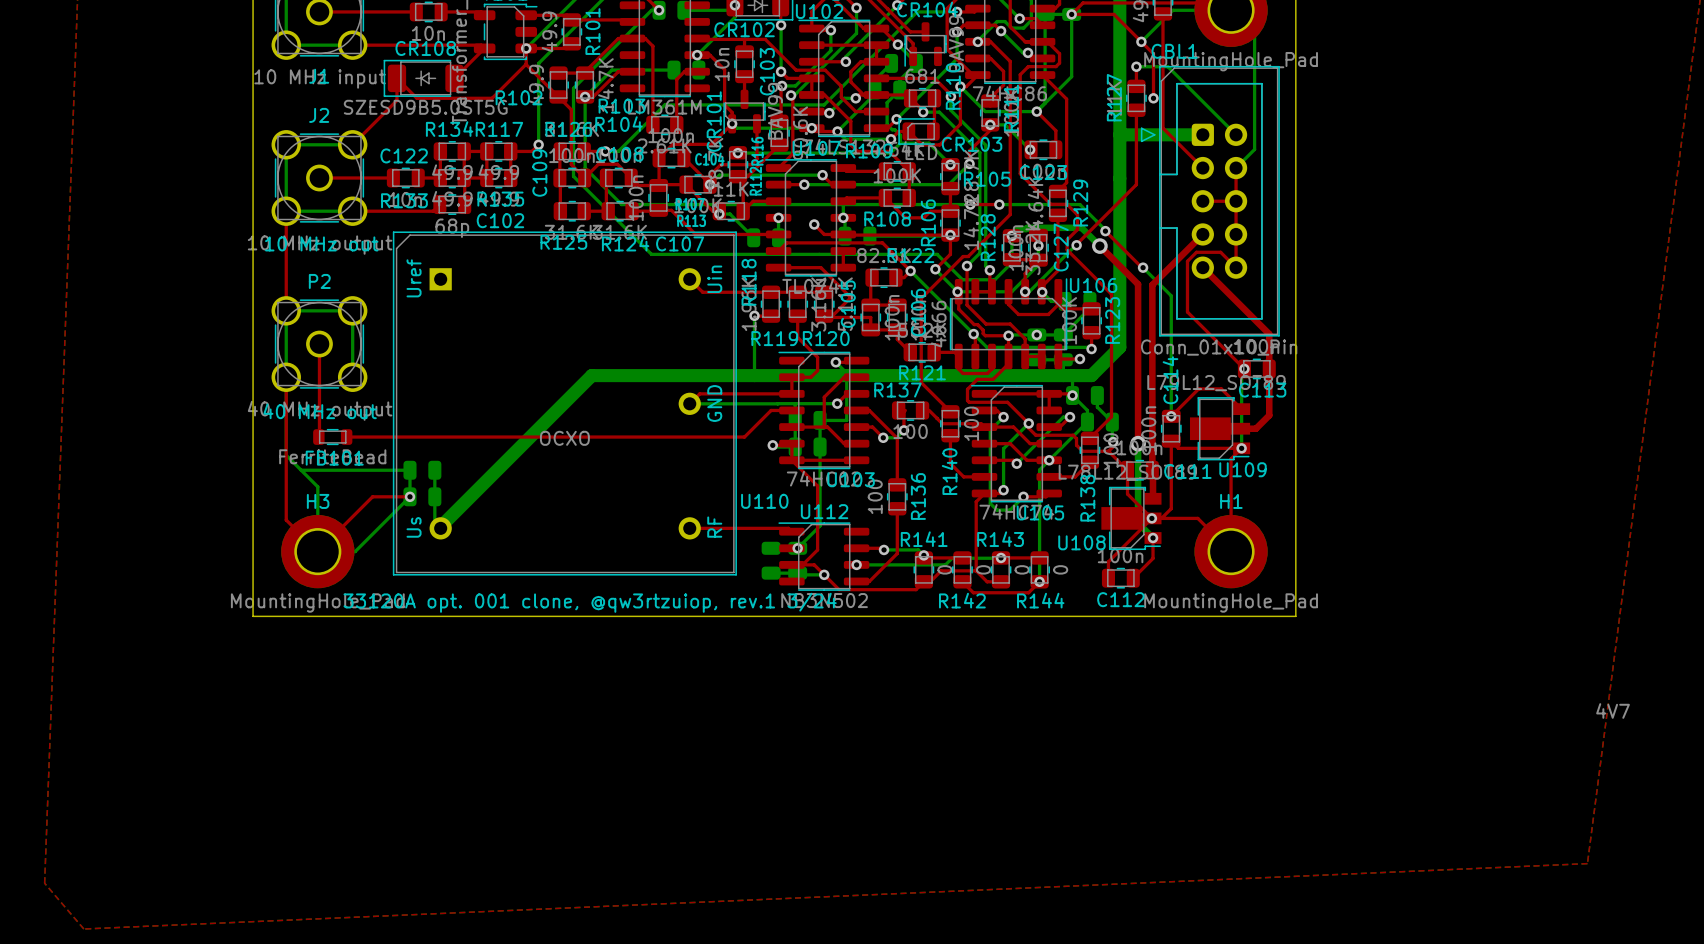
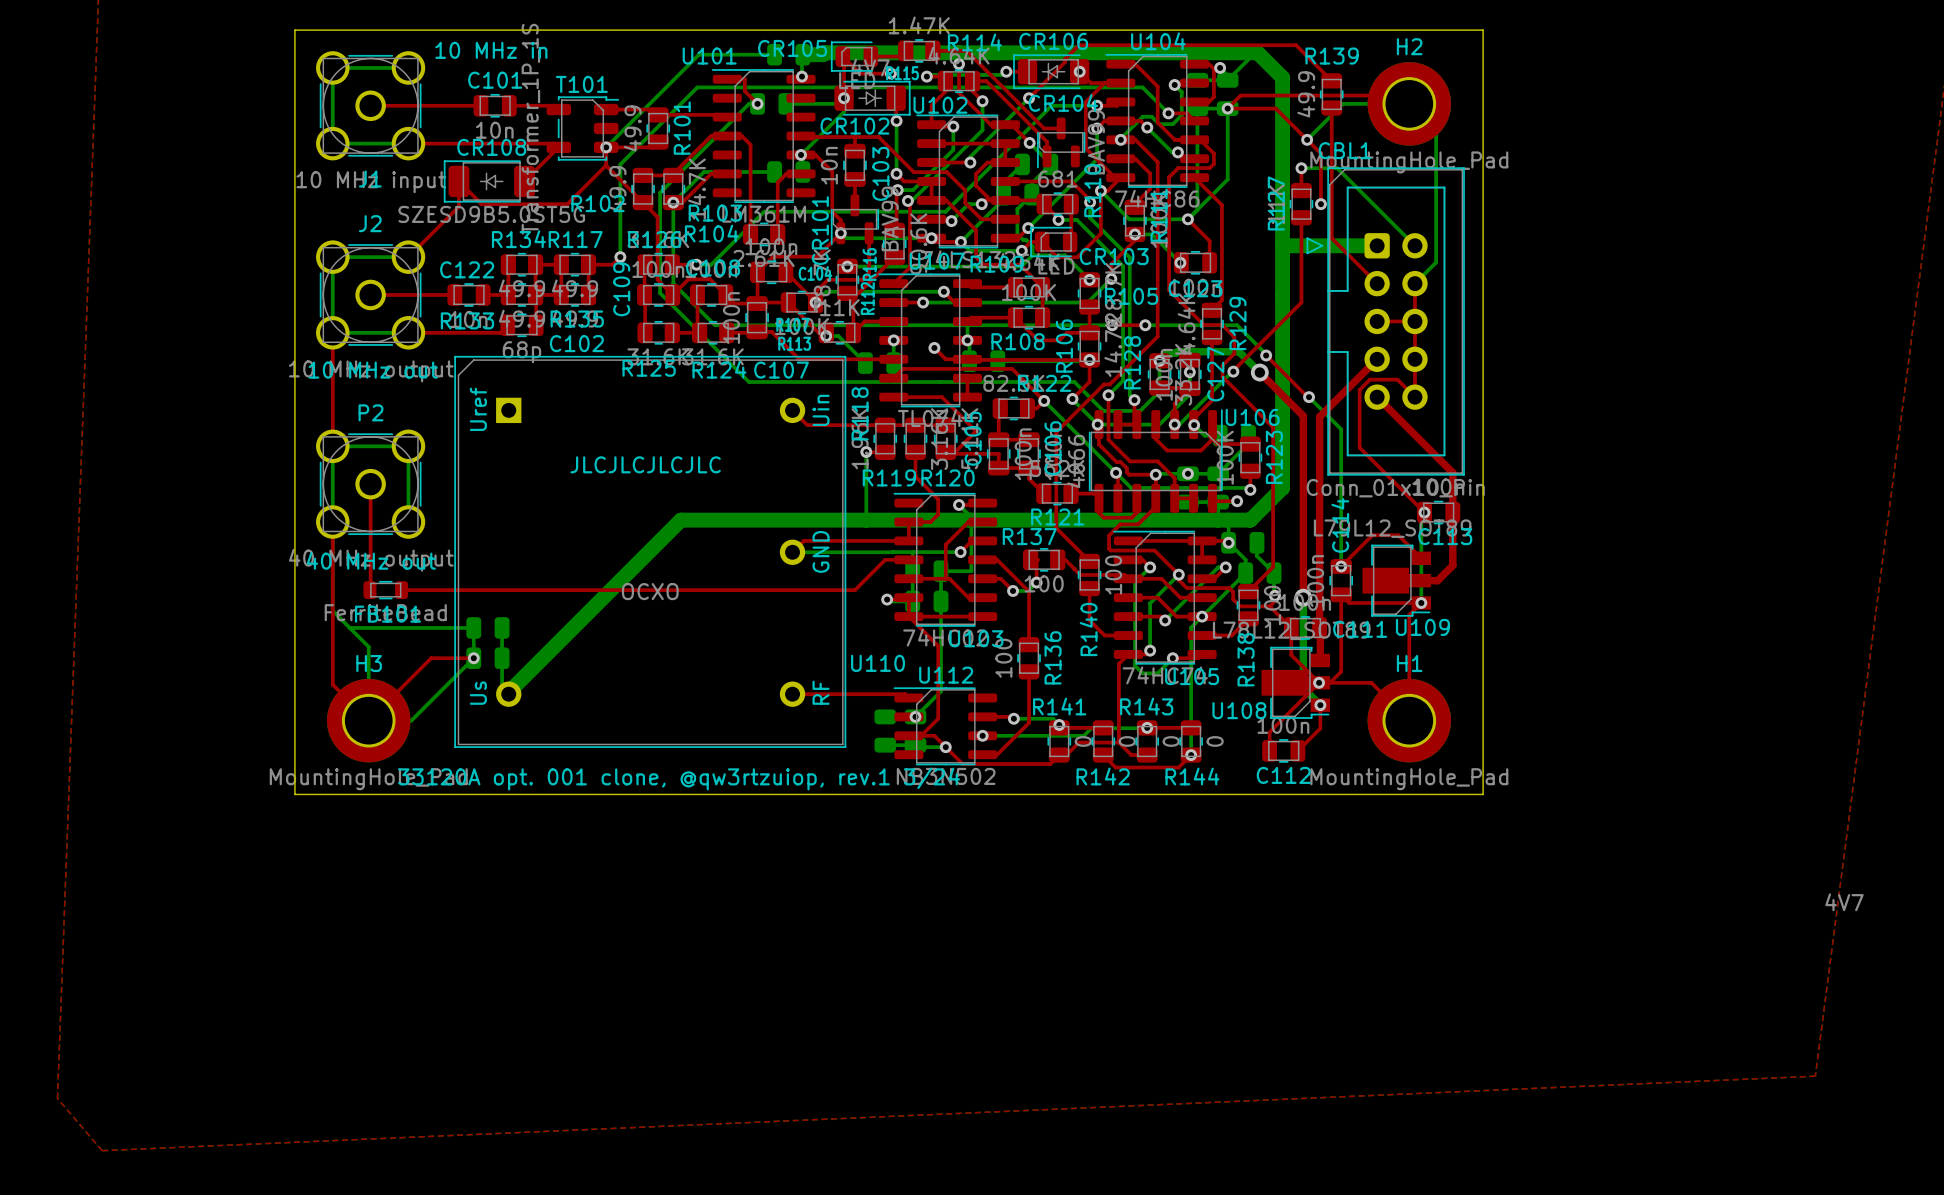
text: none -> JLCJLCJLCJLC (645, 464)

